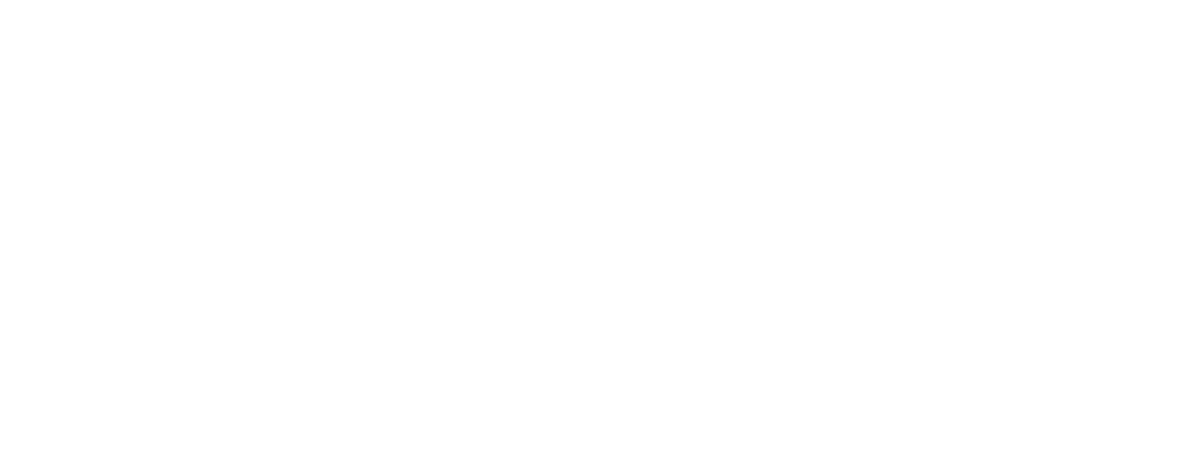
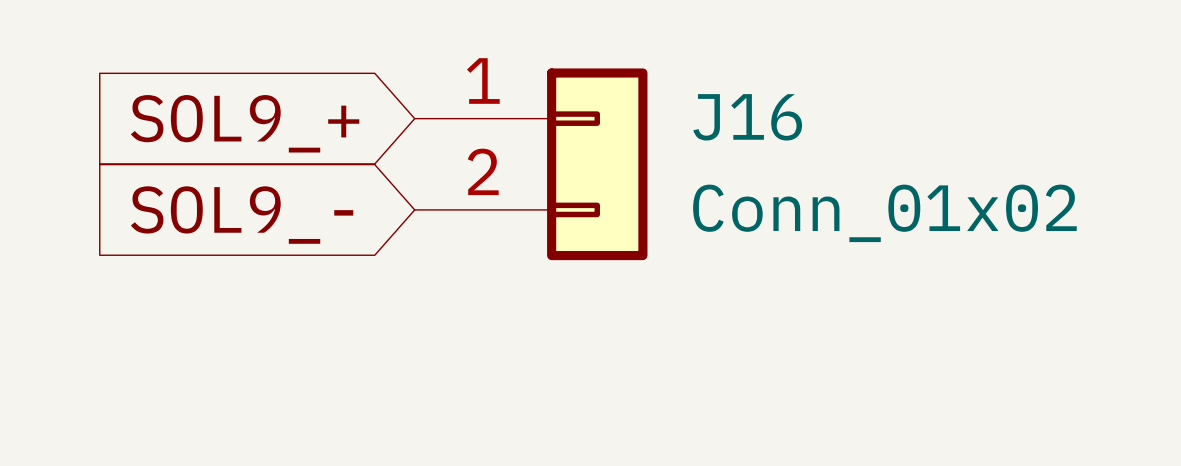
global label: none -> SOL9_+ (245, 123)
J16: none -> Conn_01x02 (531, 164)
global label: none -> SOL9_- (242, 215)

